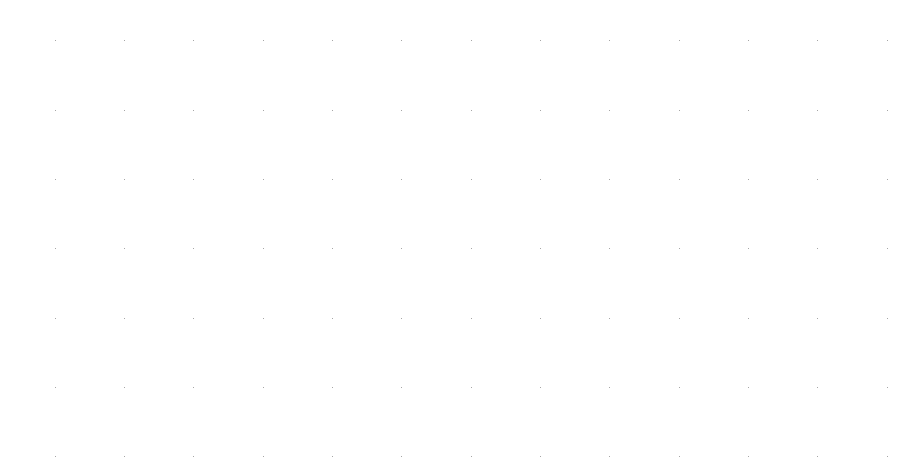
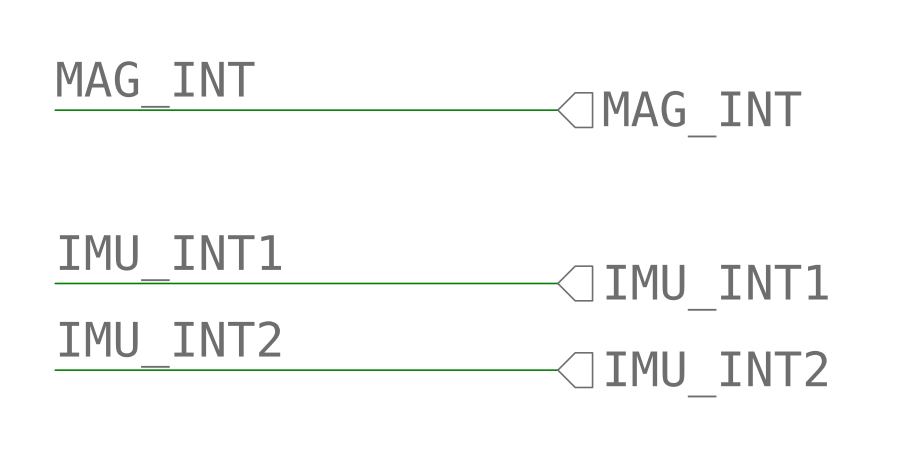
label: none -> MAG_INT (155, 84)
wire: none -> (55, 110) (557, 110)
hierarchical label: none -> MAG_INT (702, 114)
label: none -> IMU_INT1 (170, 258)
wire: none -> (55, 283) (557, 283)
hierarchical label: none -> IMU_INT1 (717, 287)
label: none -> IMU_INT2 (170, 344)
wire: none -> (55, 370) (557, 370)
hierarchical label: none -> IMU_INT2 (716, 374)

